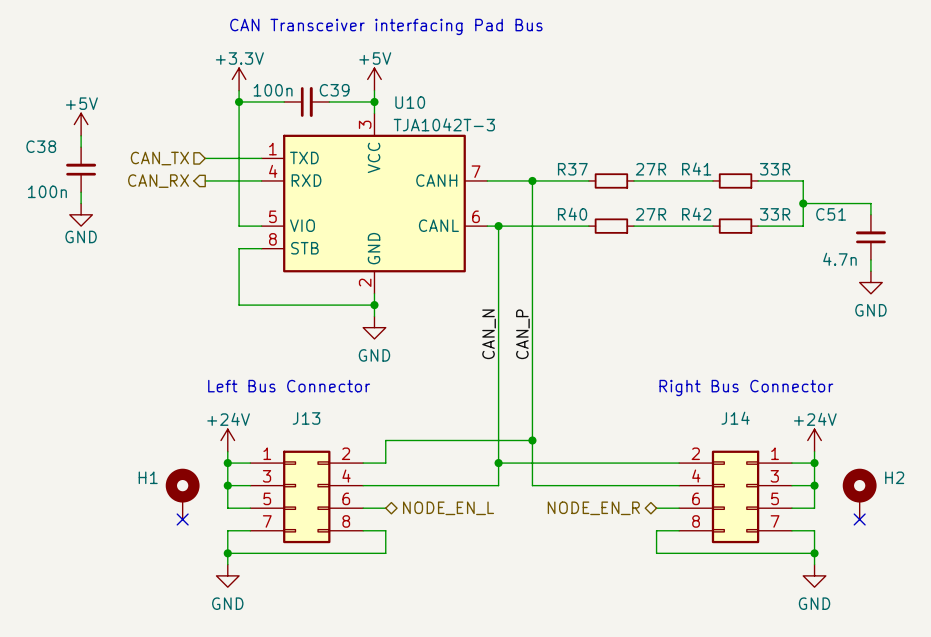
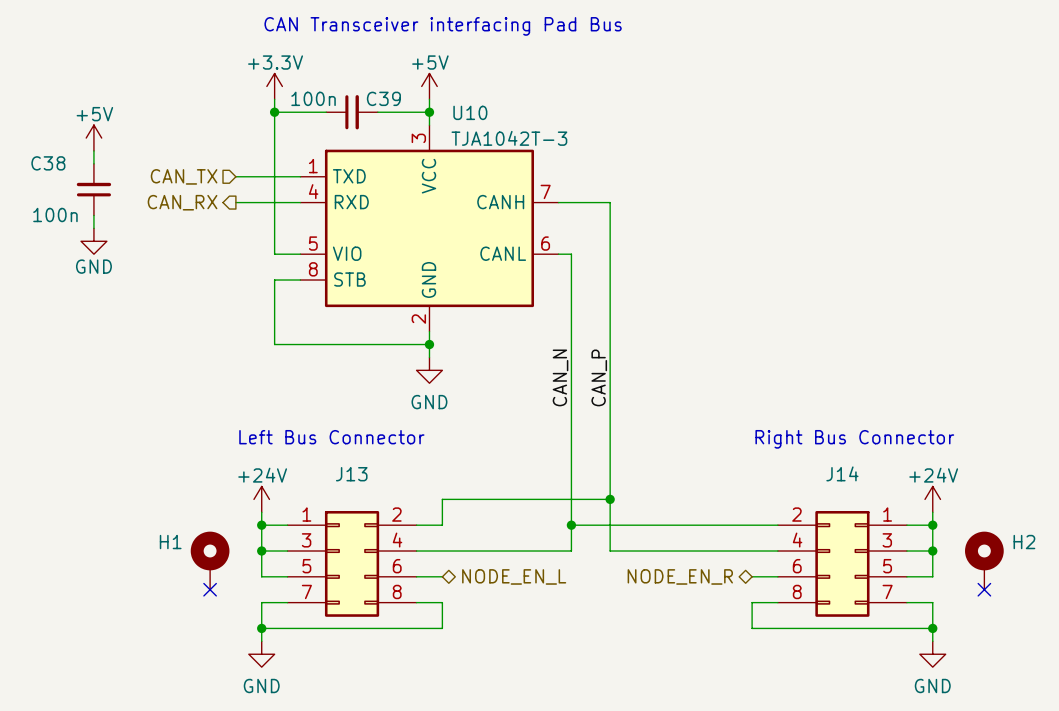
wire: (532, 180) (588, 180) -> none
junction: (532, 180) -> none
R37: 27R (611, 180) -> none
wire: (633, 180) (712, 180) -> none
R41: 33R (735, 180) -> none
wire: (758, 180) (803, 180) (803, 226) (758, 226) -> none
wire: (803, 203) (870, 203) (870, 214) -> none
junction: (803, 203) -> none
wire: (498, 226) (588, 226) -> none
junction: (498, 226) -> none
R40: 27R (611, 226) -> none
wire: (633, 226) (712, 226) -> none
R42: 33R (735, 226) -> none
C51: 4.7n (870, 237) -> none
wire: (870, 259) (870, 271) -> none
power symbol: GND (870, 282) -> none

